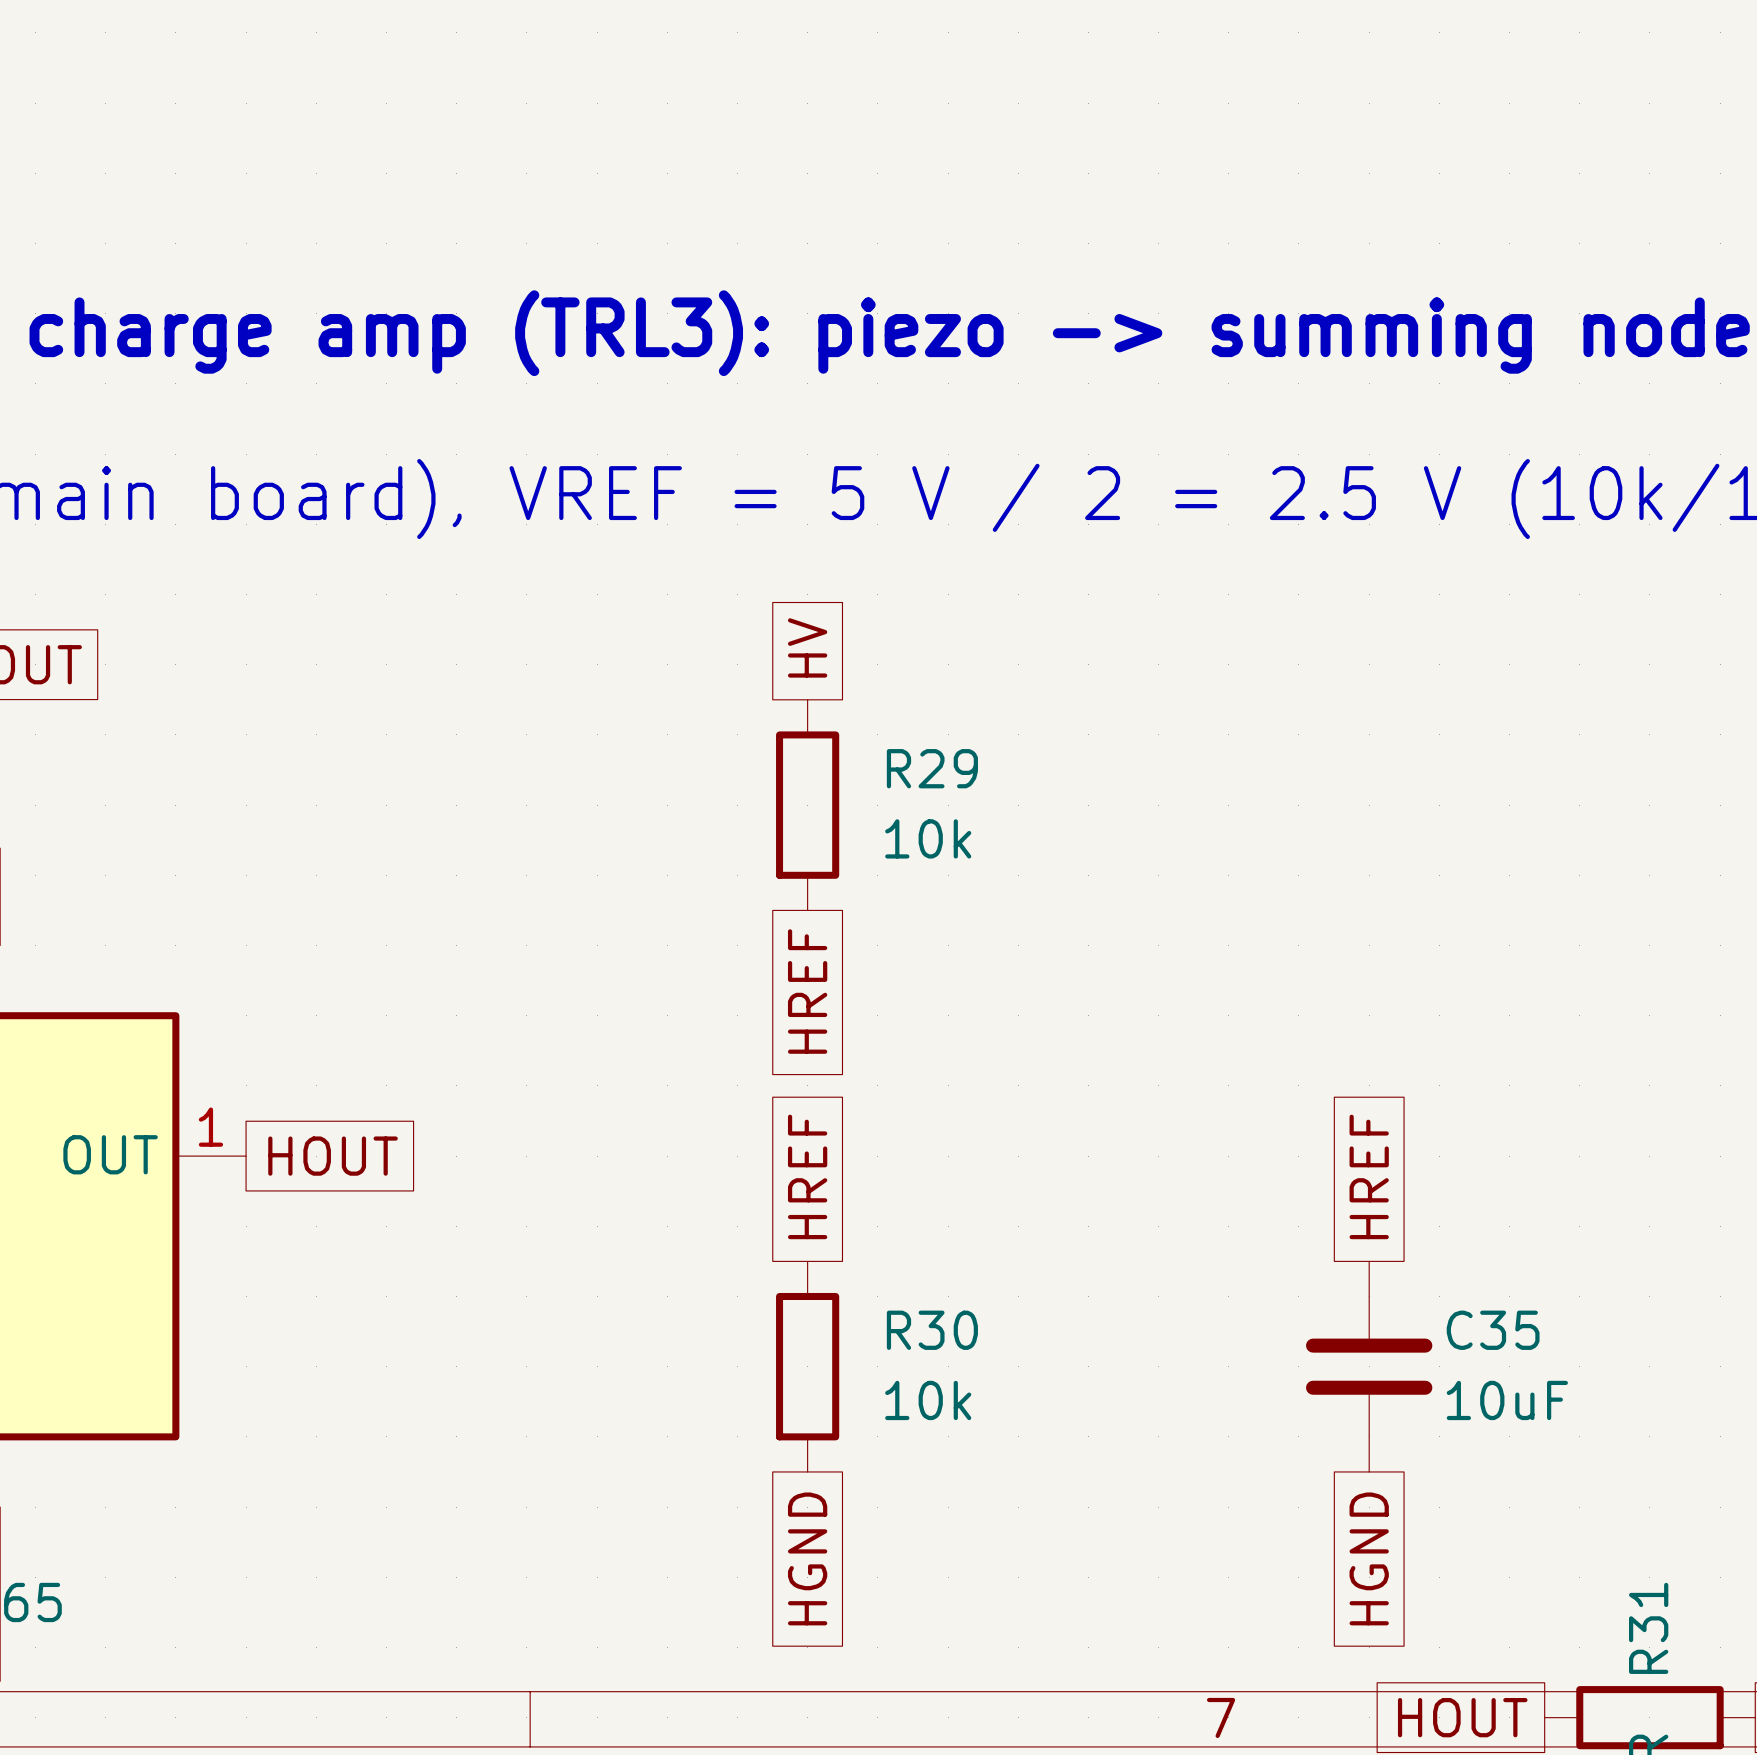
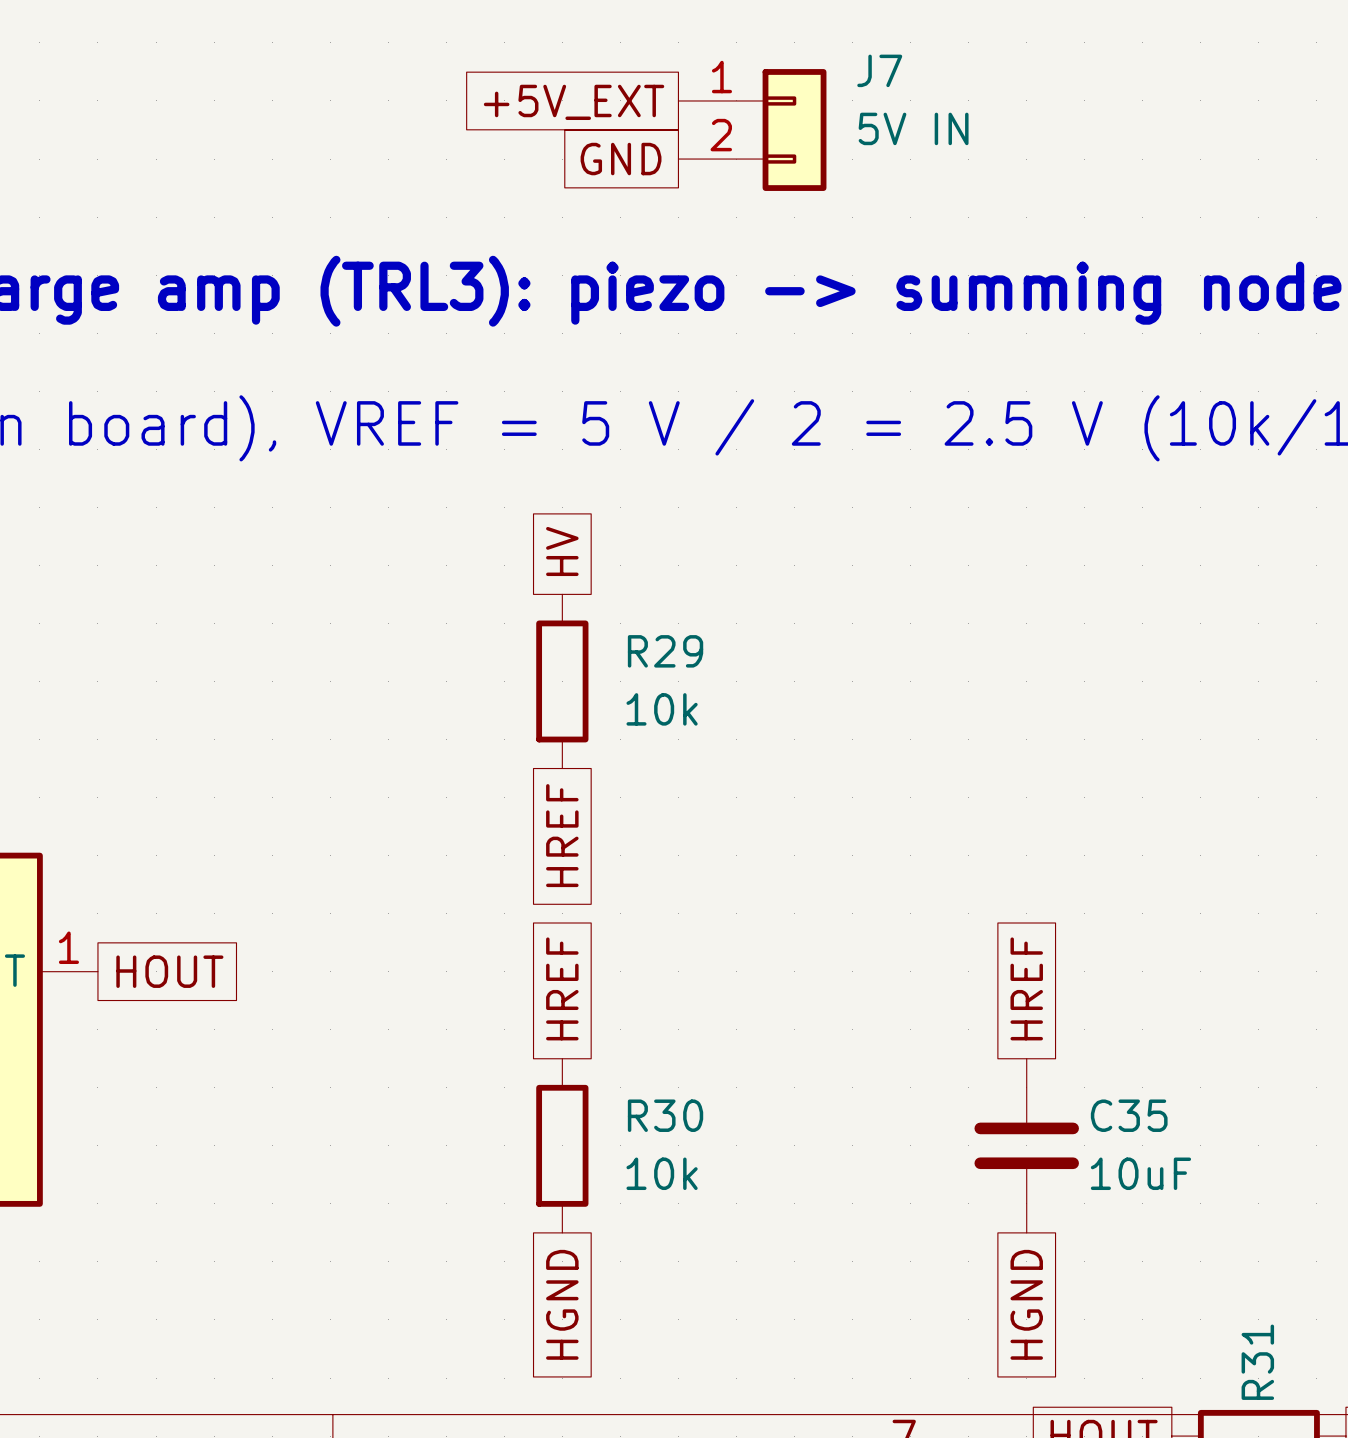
global label: none -> +5V_EXT (574, 102)
J7: none -> 5V IN (752, 130)
global label: none -> GND (621, 159)

